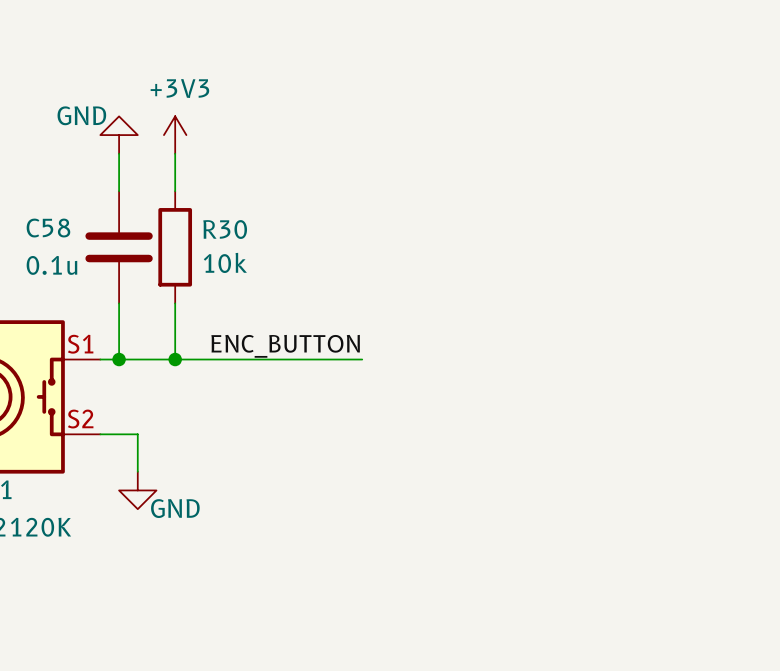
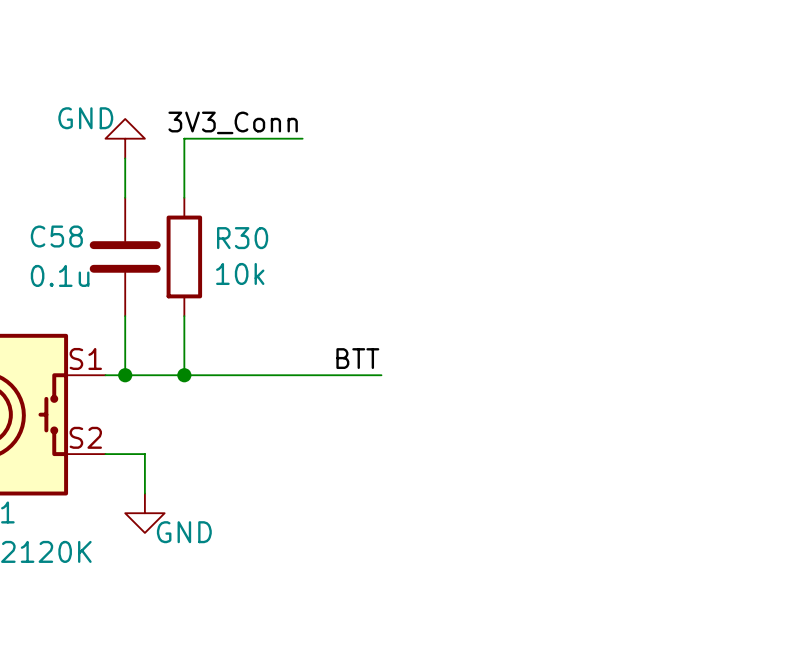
label: none -> 3V3_Conn (233, 122)
power symbol: +3V3 (175, 135) -> none
wire: none -> (302, 138) (184, 138) (184, 158)
label: ENC_BUTTON (285, 346) -> BTT (357, 358)

